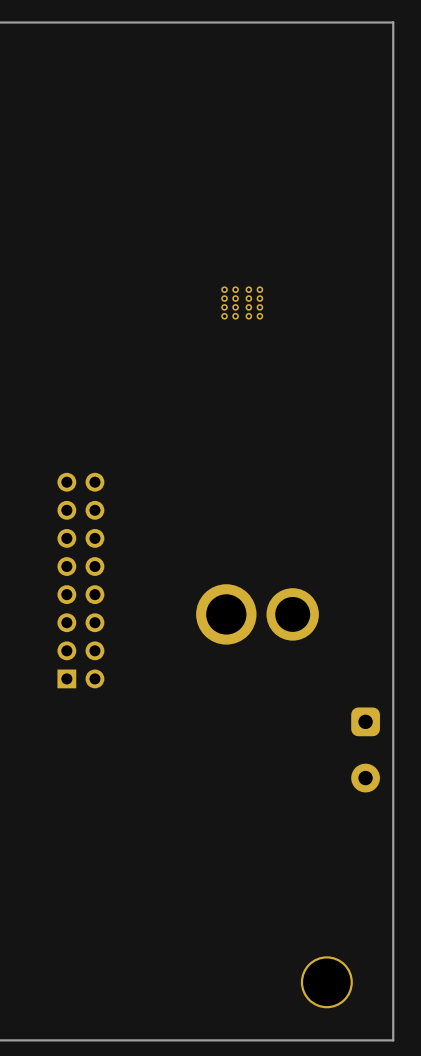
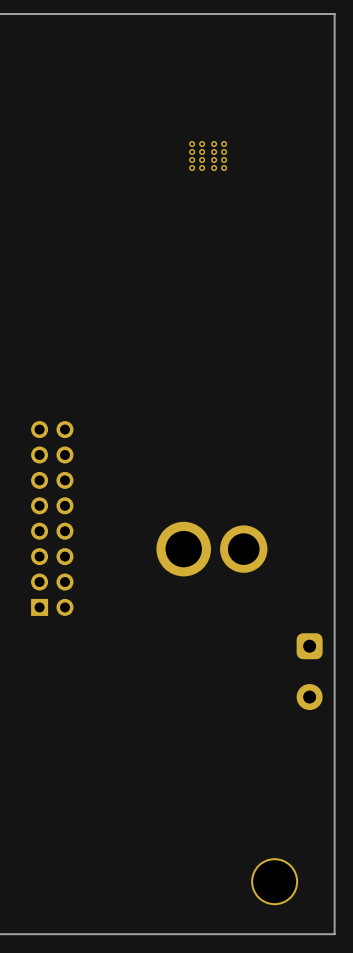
part position: (242, 302) -> (208, 156)

